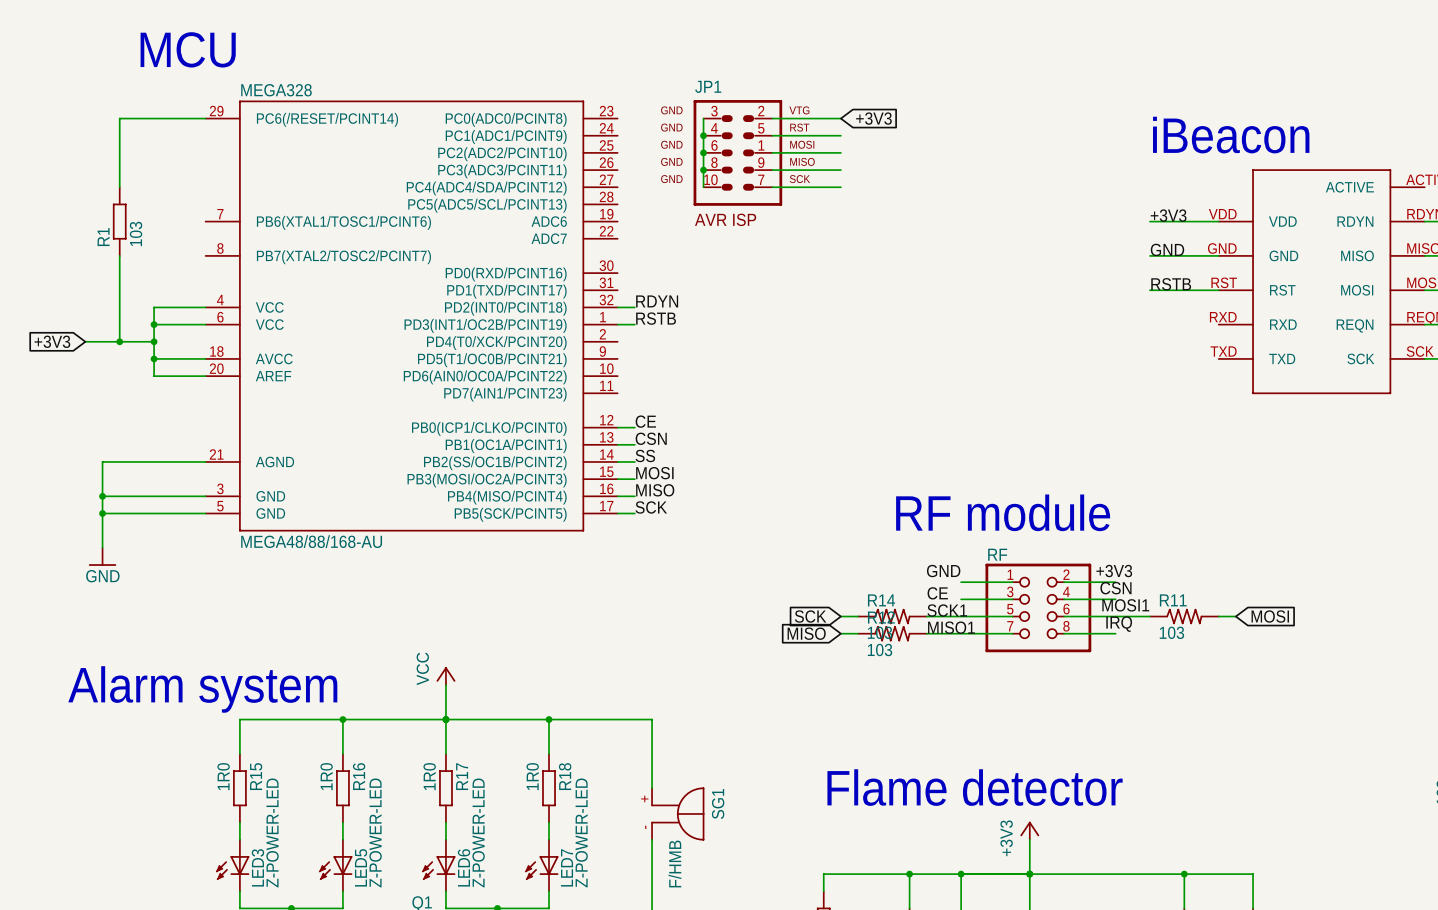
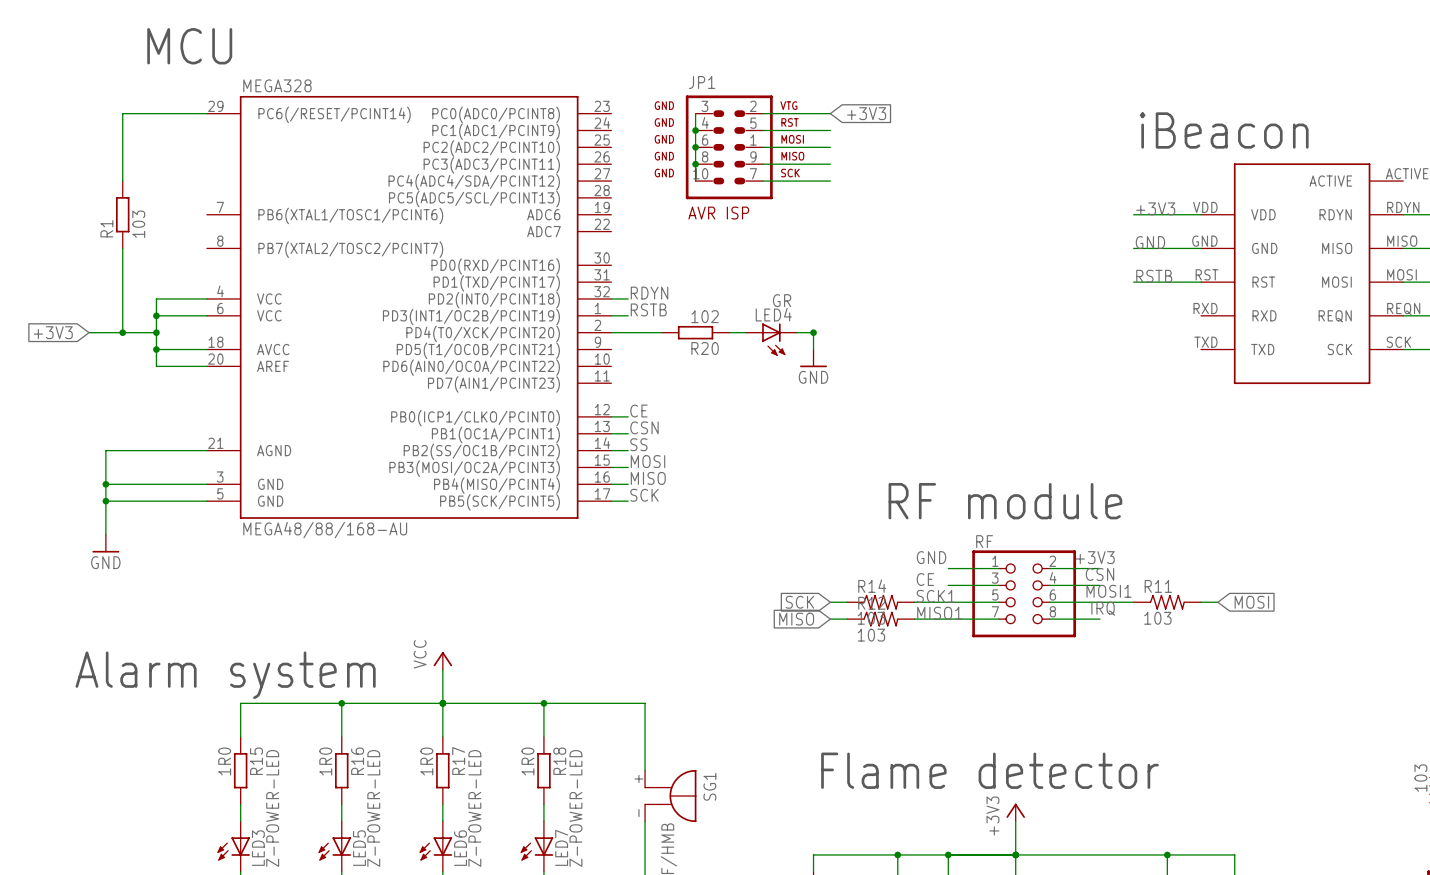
wire: none -> (611, 332) (661, 332)
R20: none -> 102 (695, 332)
wire: none -> (729, 332) (746, 332)
wire: none -> (796, 332) (813, 332) (813, 349)
junction: none -> (813, 332)
LED4: none -> GR (771, 339)
power symbol: none -> GND (813, 358)

